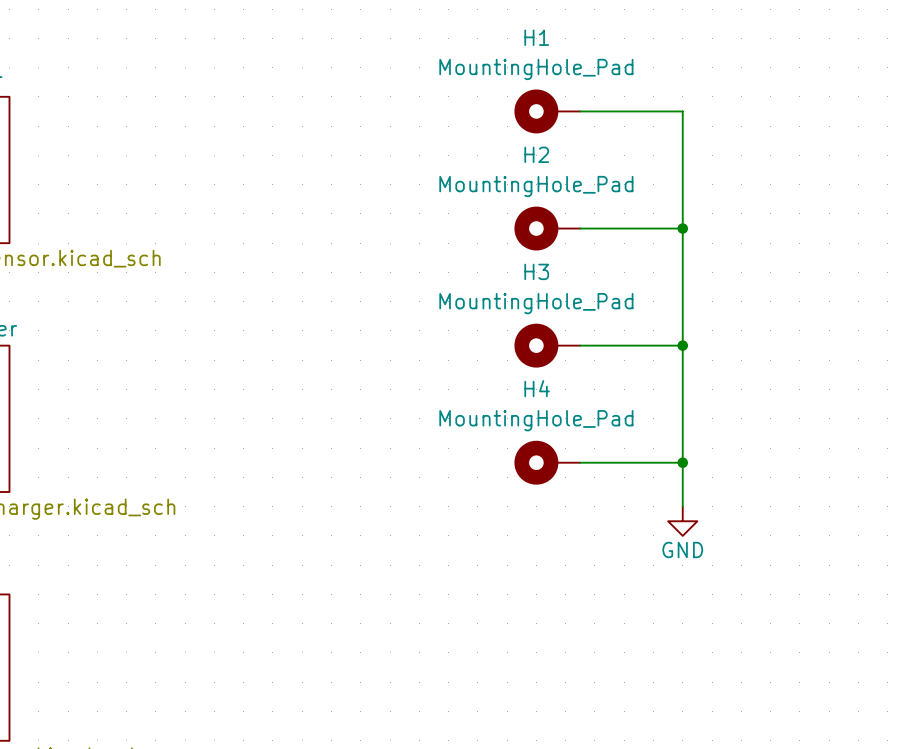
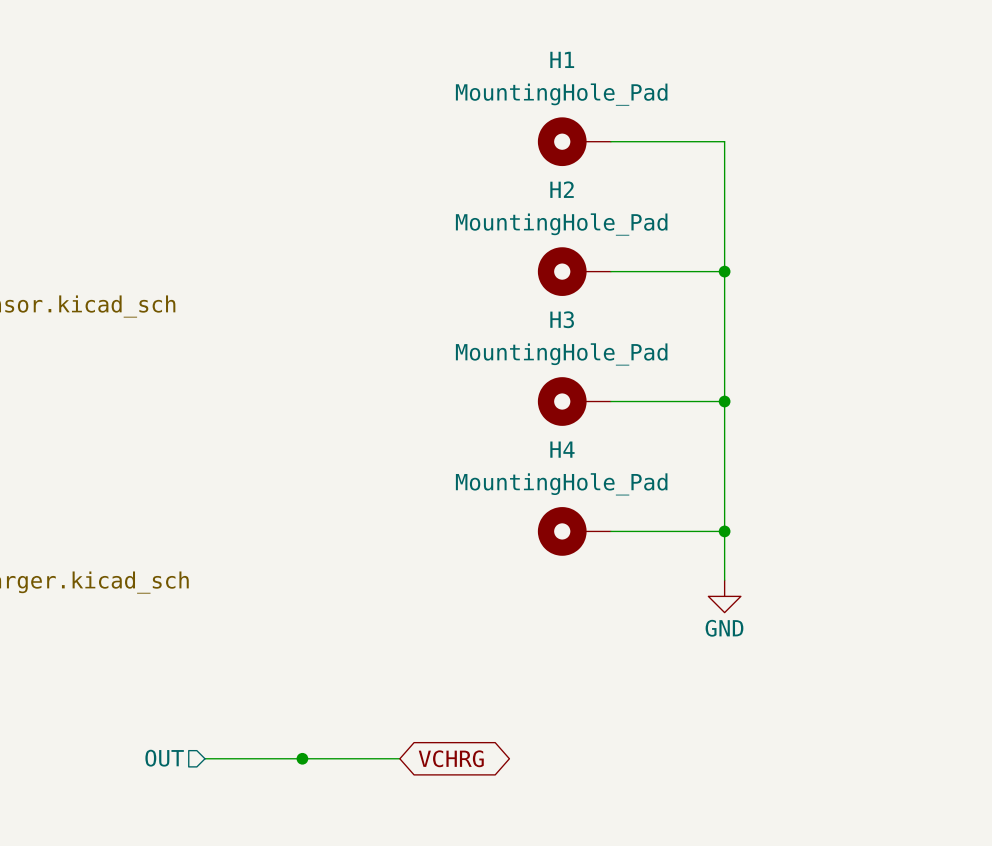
sheet pin: none -> OUT (164, 758)
wire: none -> (204, 758) (399, 758)
junction: none -> (302, 758)
global label: none -> VCHRG (451, 758)

